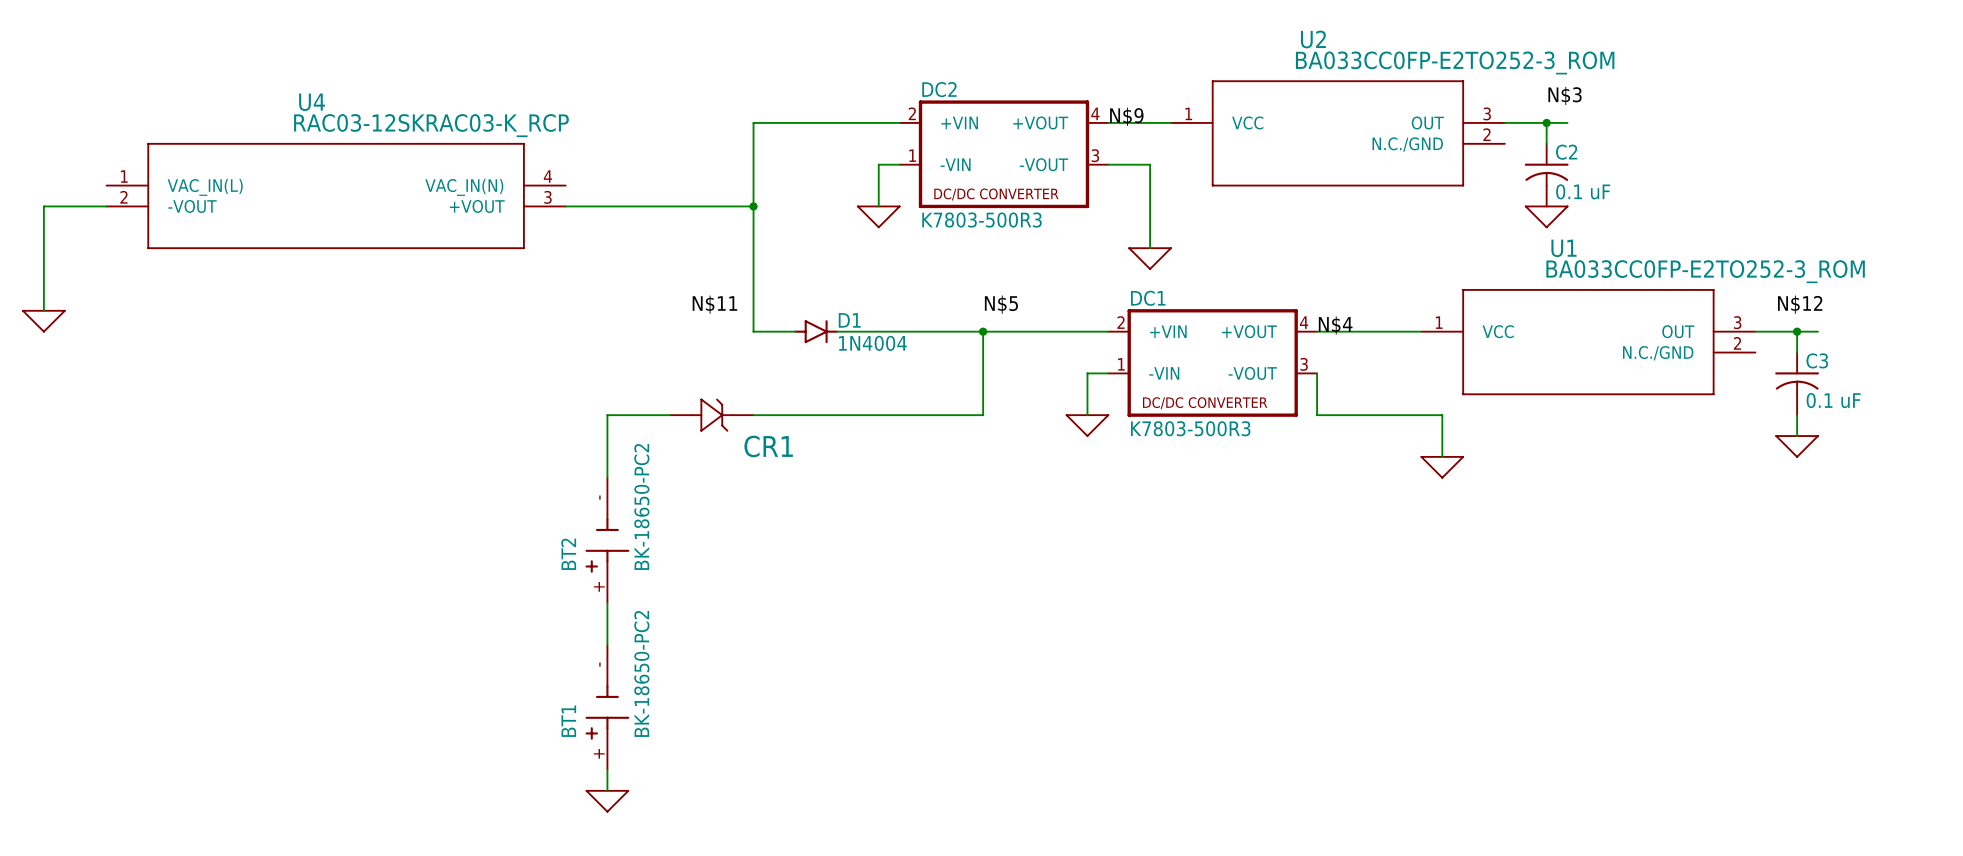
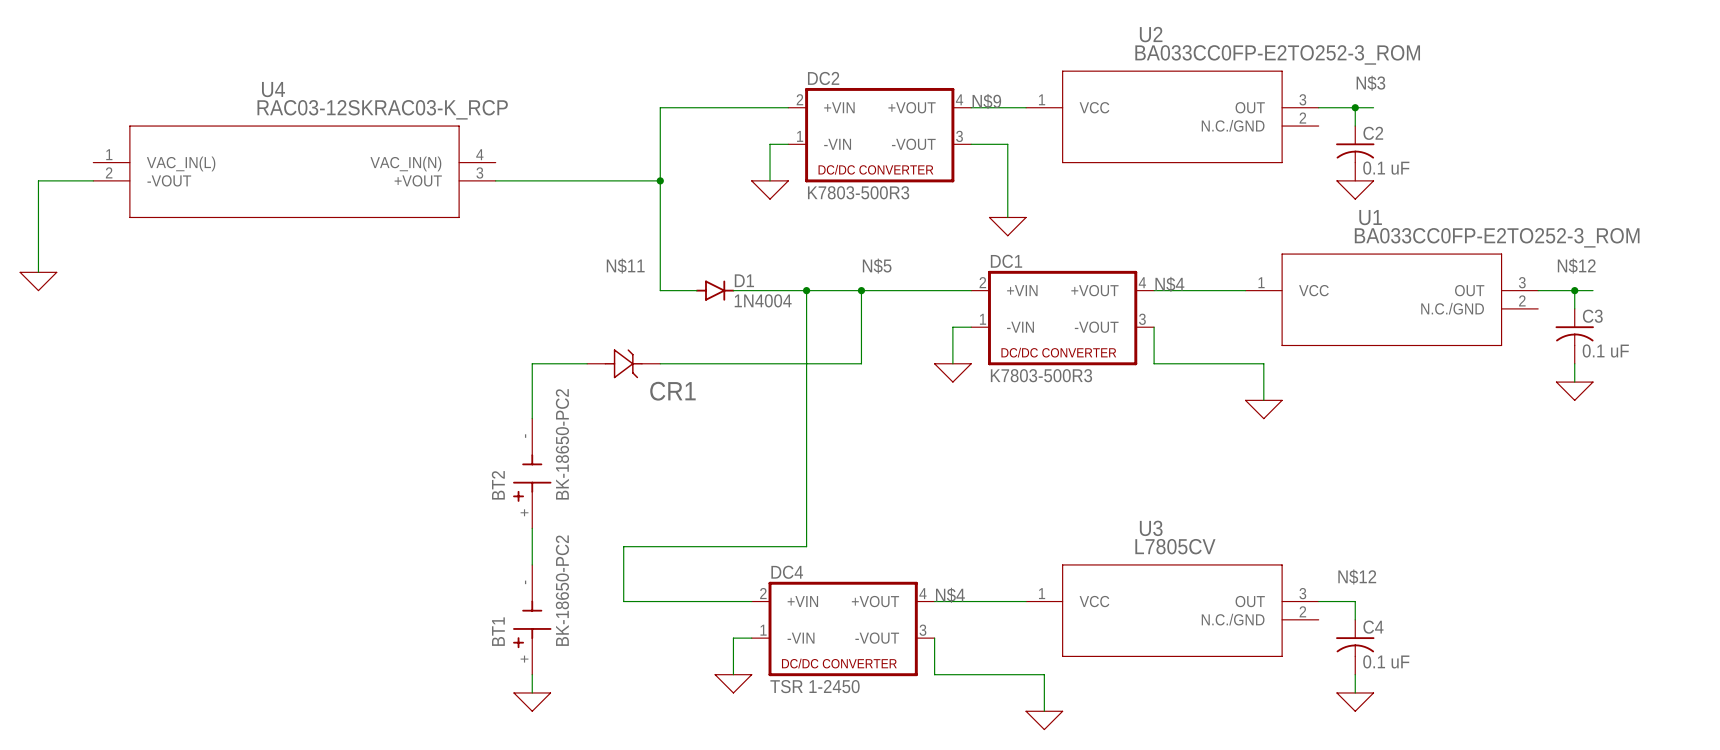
wire: none -> (806, 290) (806, 546) (623, 546) (623, 601) (751, 601)
junction: none -> (806, 290)
label: none -> N$12 (1357, 577)
label: none -> N$4 (950, 595)
wire: none -> (934, 601) (1026, 601)
wire: none -> (1318, 601) (1355, 601) (1355, 619)
U3: none -> L7805CV (1172, 610)
DC4: none -> TSR 1-2450 (843, 628)
wire: none -> (751, 638) (733, 638) (733, 674)
wire: none -> (934, 638) (934, 674) (1044, 674) (1044, 711)
C4: none -> 0.1 uF (1355, 647)
wire: none -> (1355, 674) (1355, 692)
power symbol: none -> (733, 683)
power symbol: none -> (1355, 702)
power symbol: none -> (1044, 720)

